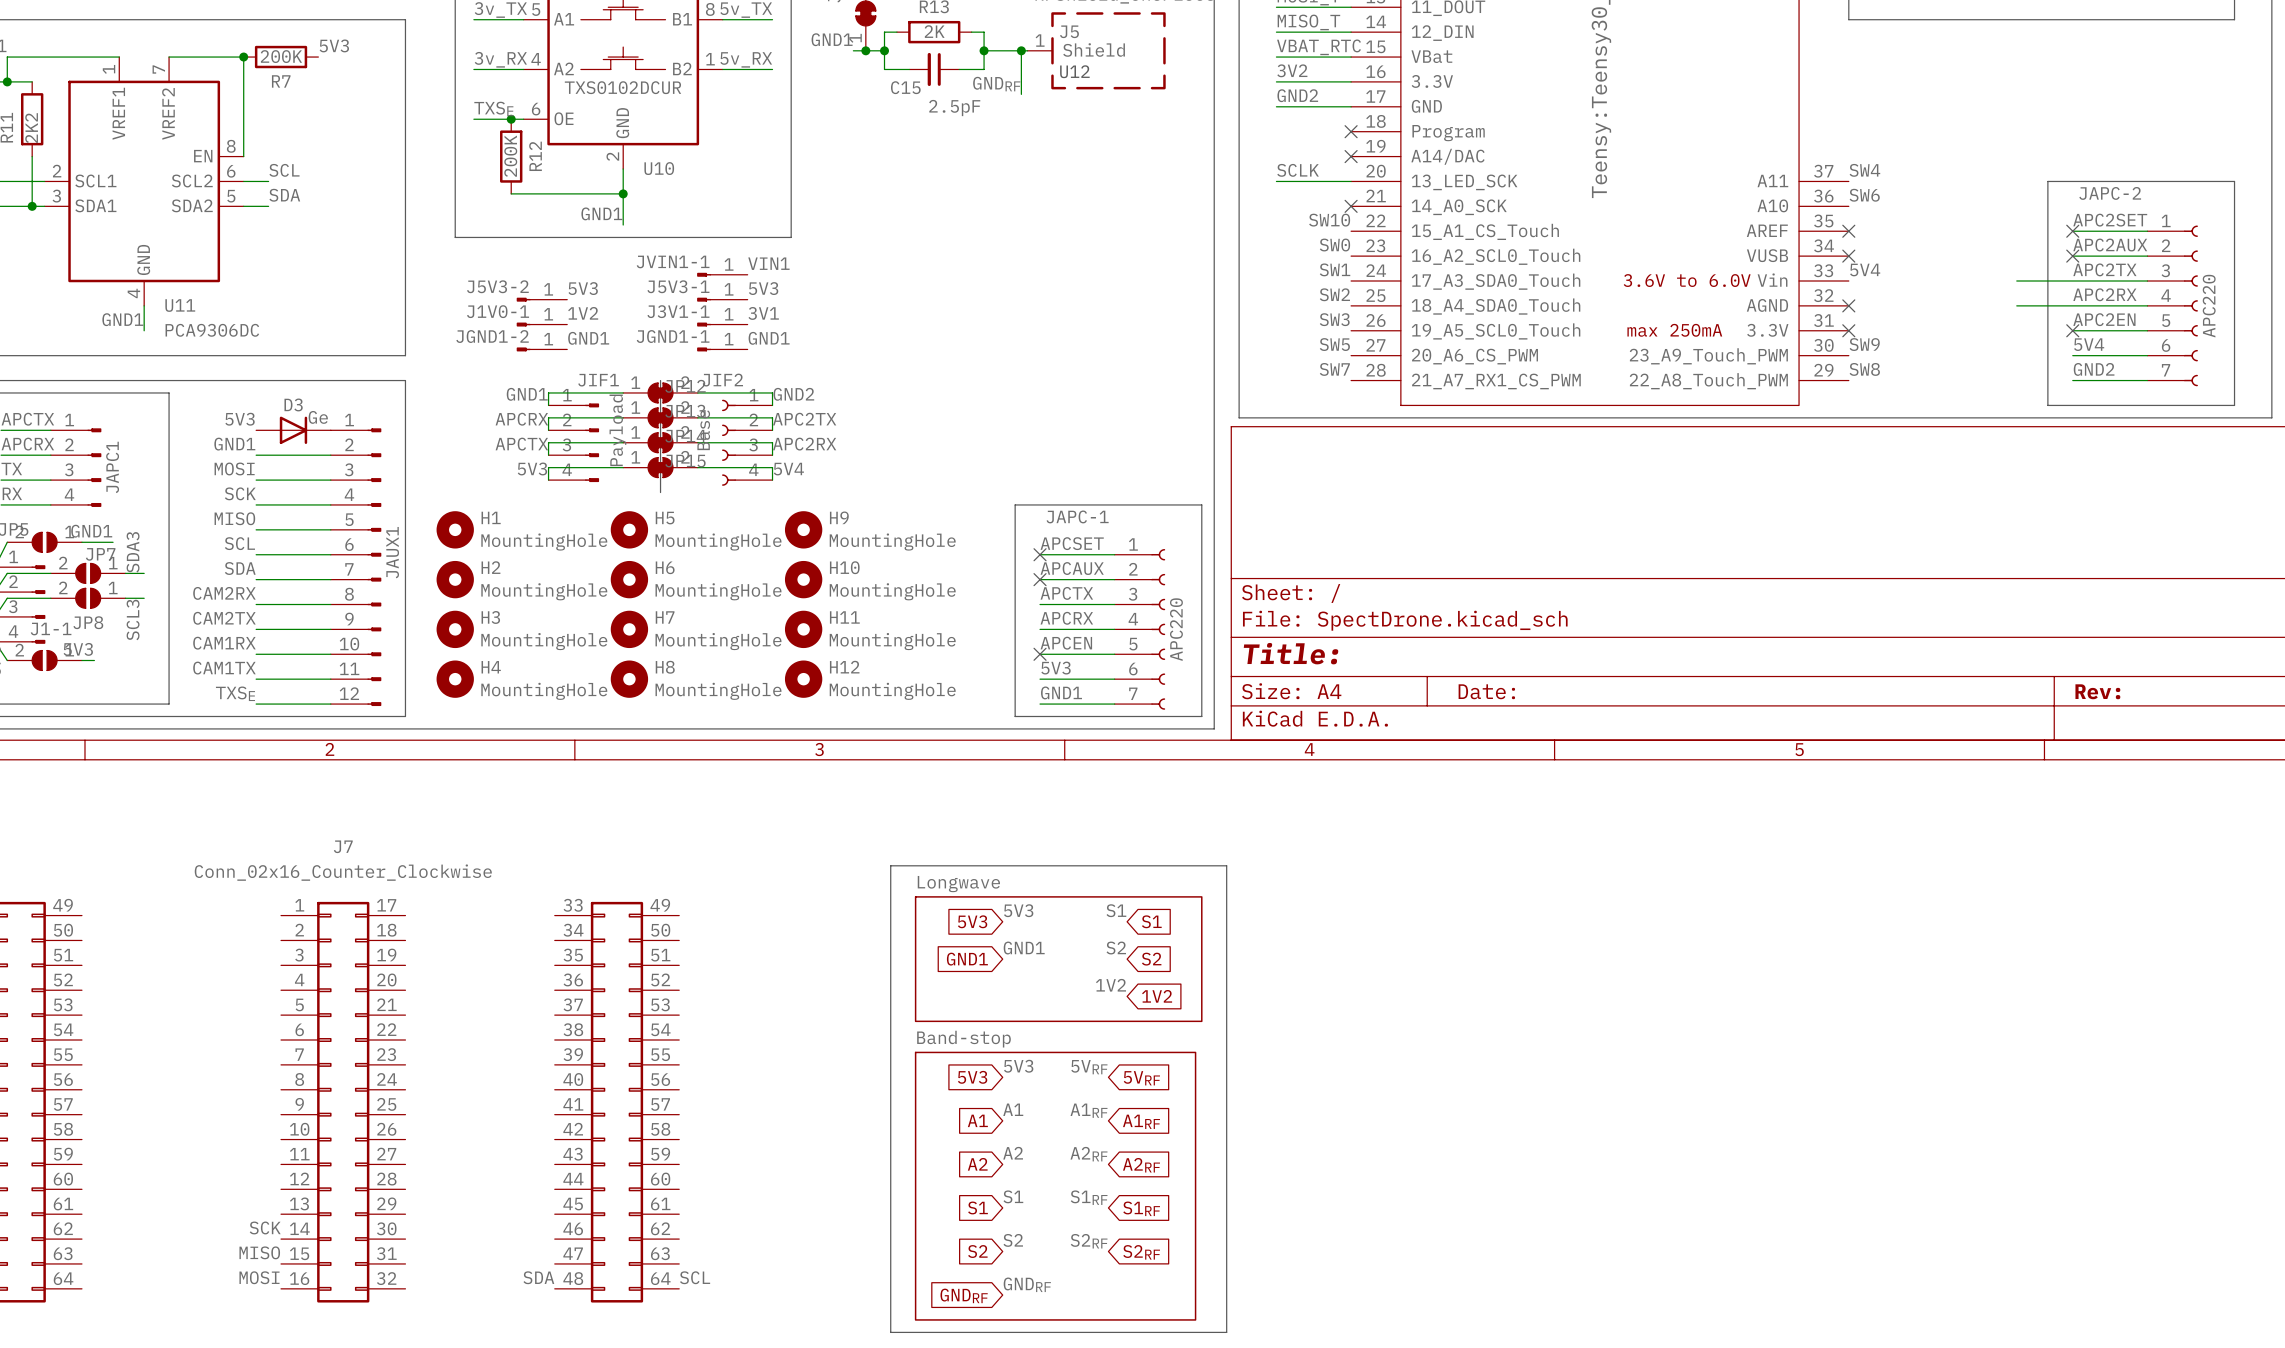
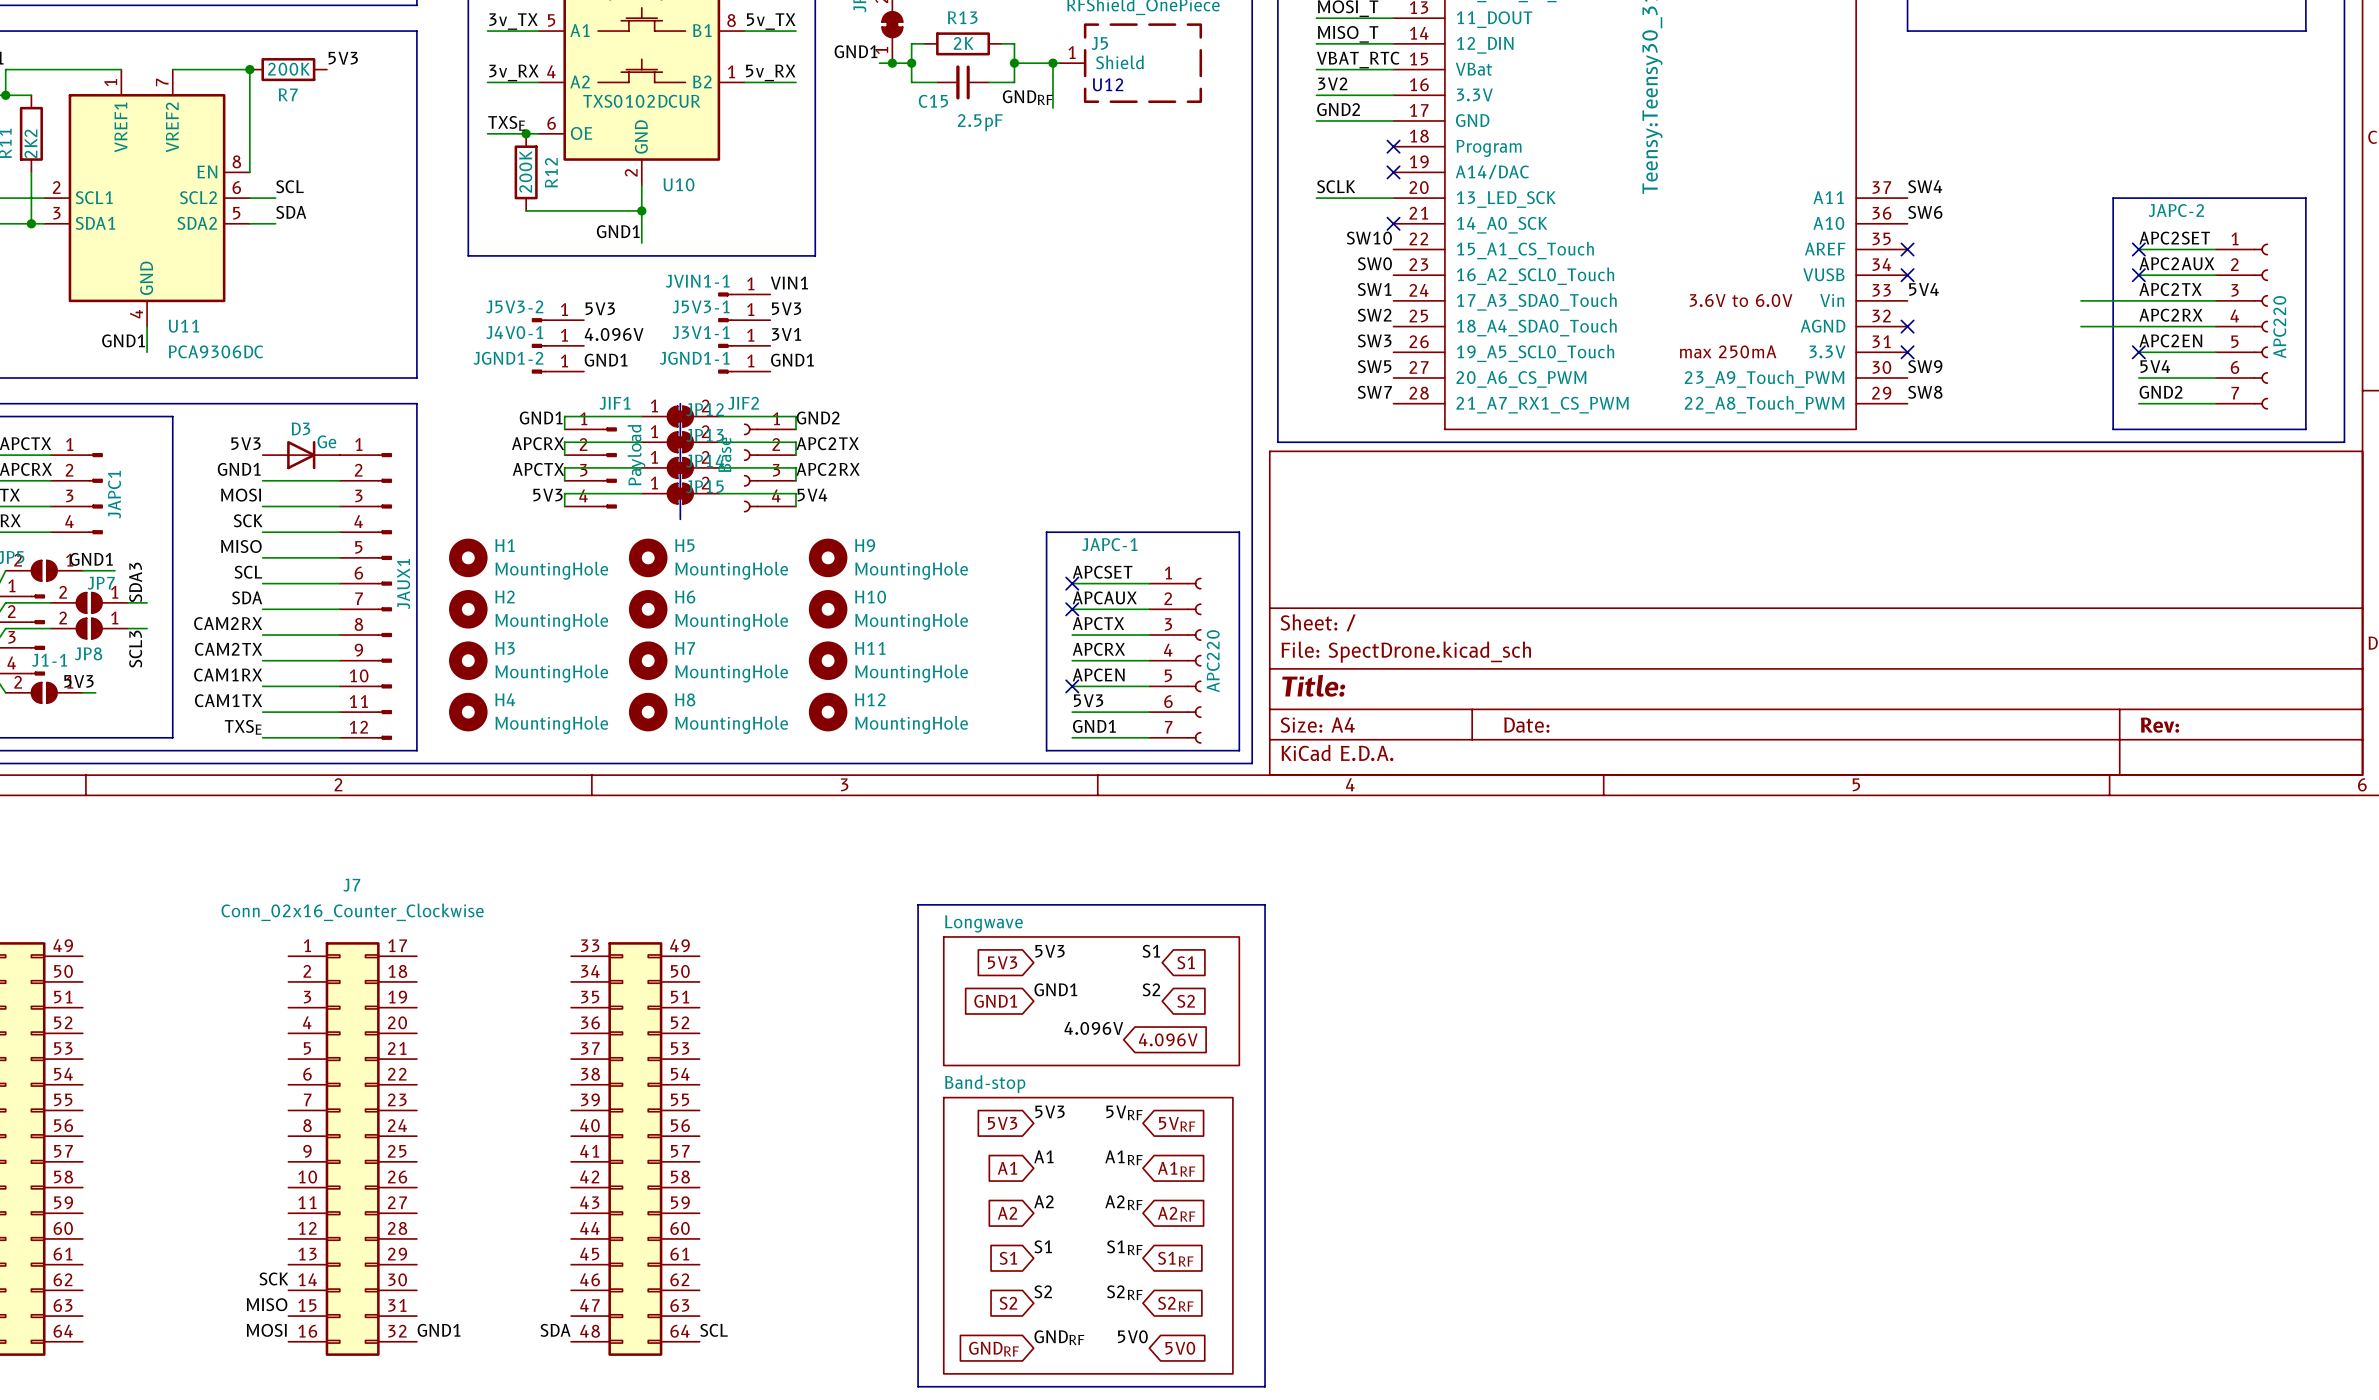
J1V0-1 name: J1V0-1 (498, 311) -> J4V0-1 (514, 332)
label: 1V2 (583, 313) -> 4.096V (614, 334)
label: none -> 4.096V (1093, 1028)
label: 1V2 (1111, 985) -> none
global label: none -> 4.096V (1168, 1039)
global label: 1V2 (1157, 996) -> none
label: none -> GND1 (439, 1330)
label: none -> 5V0 (1132, 1336)
global label: none -> 5V0 (1180, 1348)

